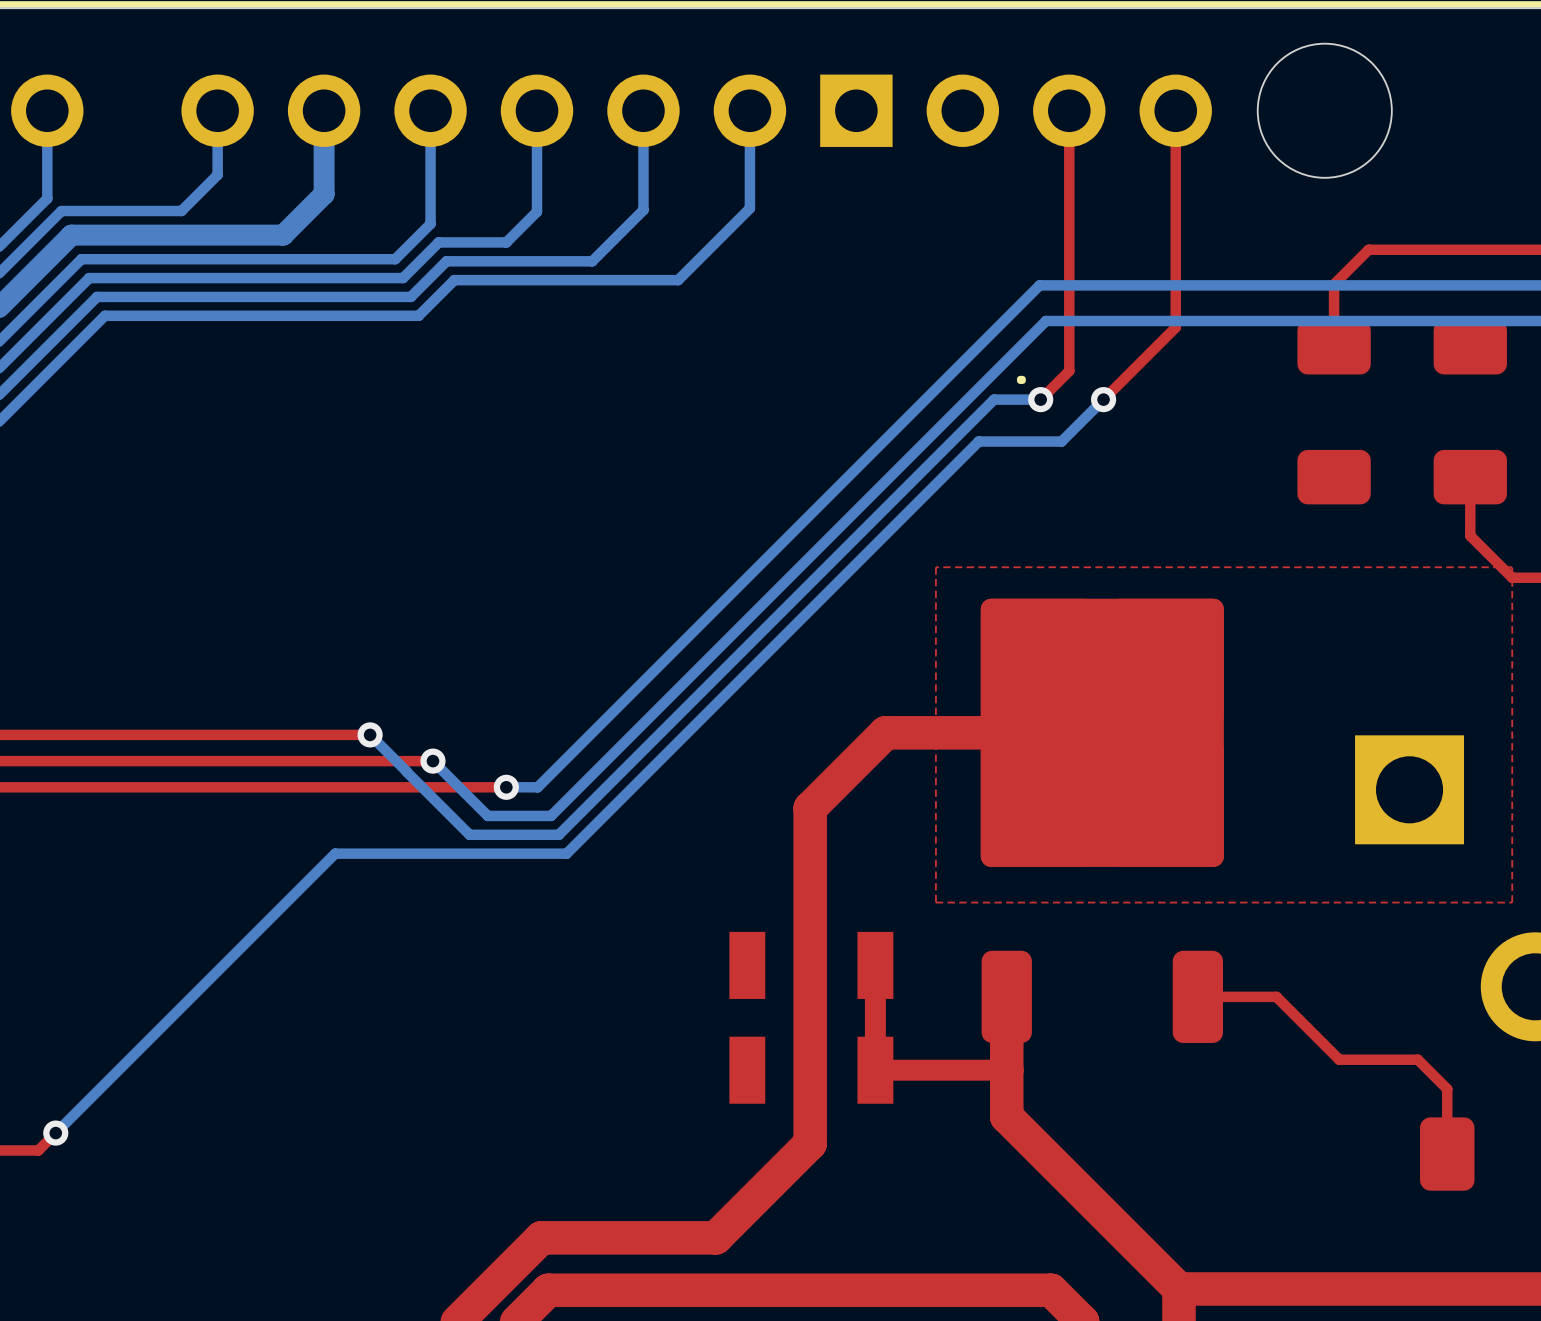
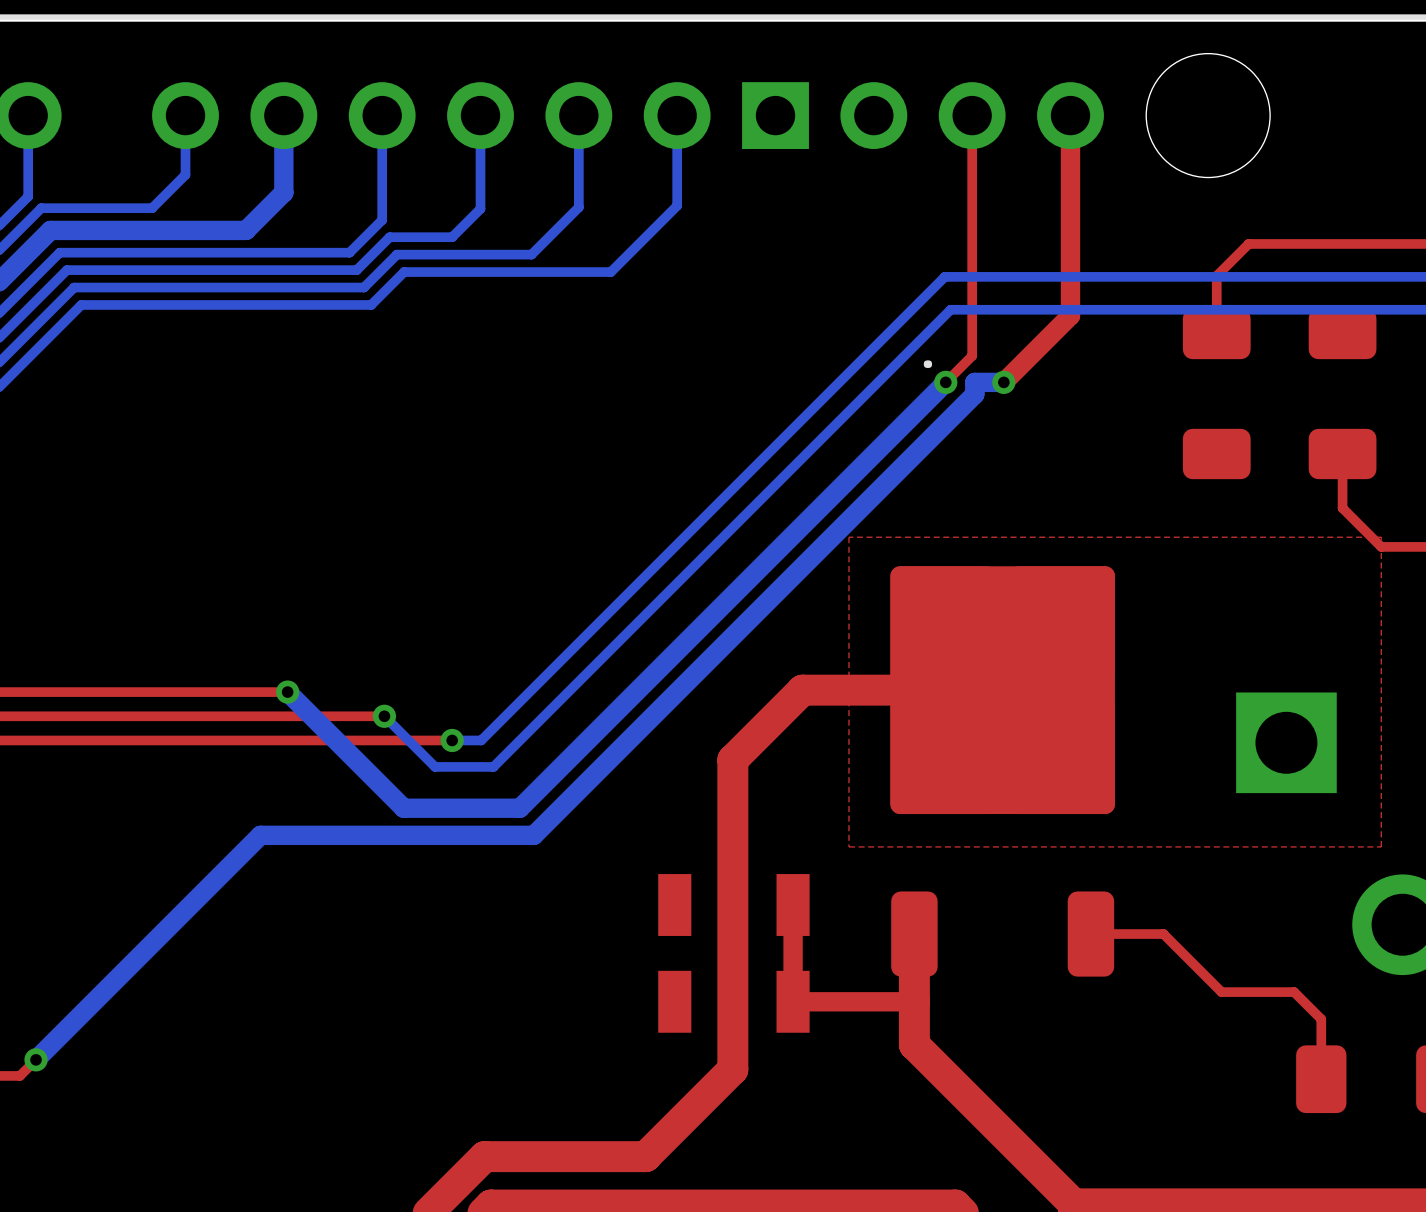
top track width: thin (1175, 110) (1175, 327) (1103, 399) -> thick (1070, 115) (1070, 315) (1003, 382)
bottom track: (1040, 399) (994, 399) (558, 834) (469, 834) (370, 734) -> (945, 382) (519, 808) (403, 808) (287, 692)
bottom track: (1103, 399) (1061, 441) (978, 441) (566, 853) (335, 853) (298, 889) -> (1003, 382) (974, 382) (974, 394) (533, 835) (260, 835)
top track: (370, 734) (328, 734) -> none
via position: (370, 734) -> (287, 692)
bottom track width: thin (298, 889) (55, 1133) -> thick (260, 835) (36, 1059)

